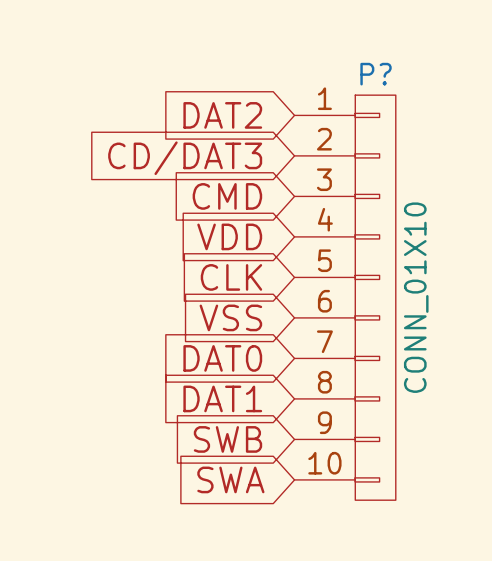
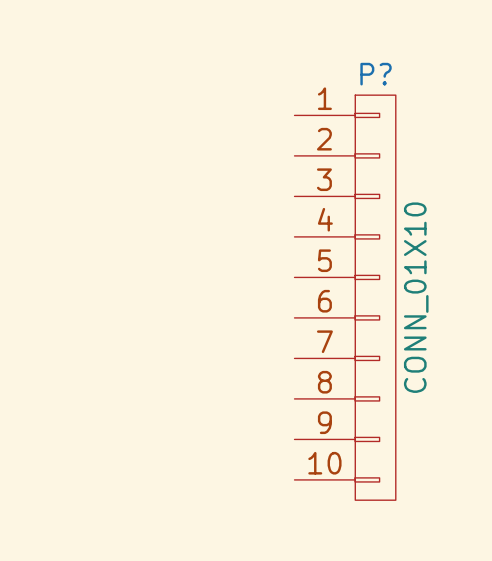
global label: DAT2 (222, 115) -> none
global label: CD/DAT3 (185, 158) -> none
global label: CMD (227, 196) -> none
global label: VDD (229, 236) -> none
global label: CLK (231, 277) -> none
global label: VSS (230, 317) -> none
global label: DAT0 (222, 358) -> none
global label: DAT1 (222, 398) -> none
global label: SWB (227, 439) -> none
global label: SWA (230, 479) -> none

